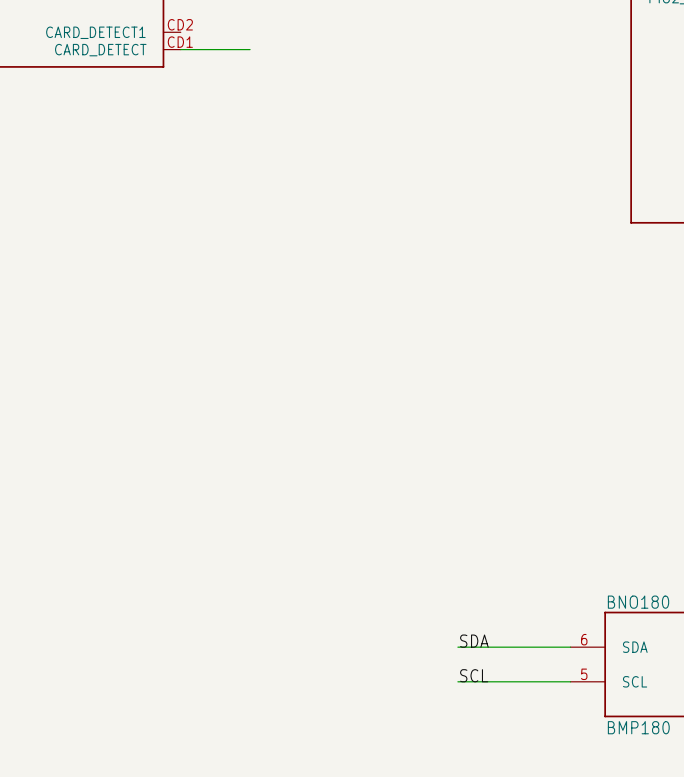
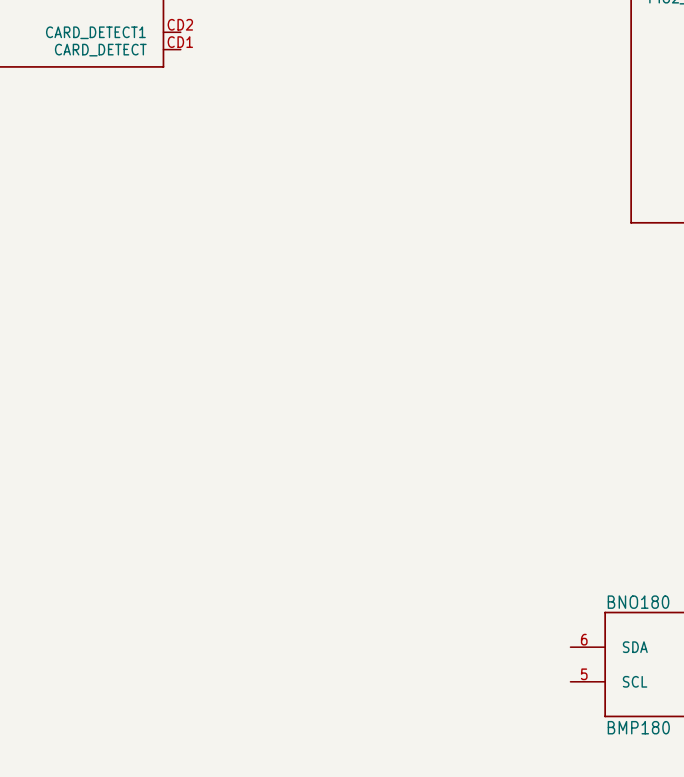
wire: (180, 49) (250, 49) -> none
label: SDA (474, 641) -> none
wire: (457, 647) (570, 647) -> none
label: SCL (474, 675) -> none
wire: (457, 681) (570, 681) -> none

